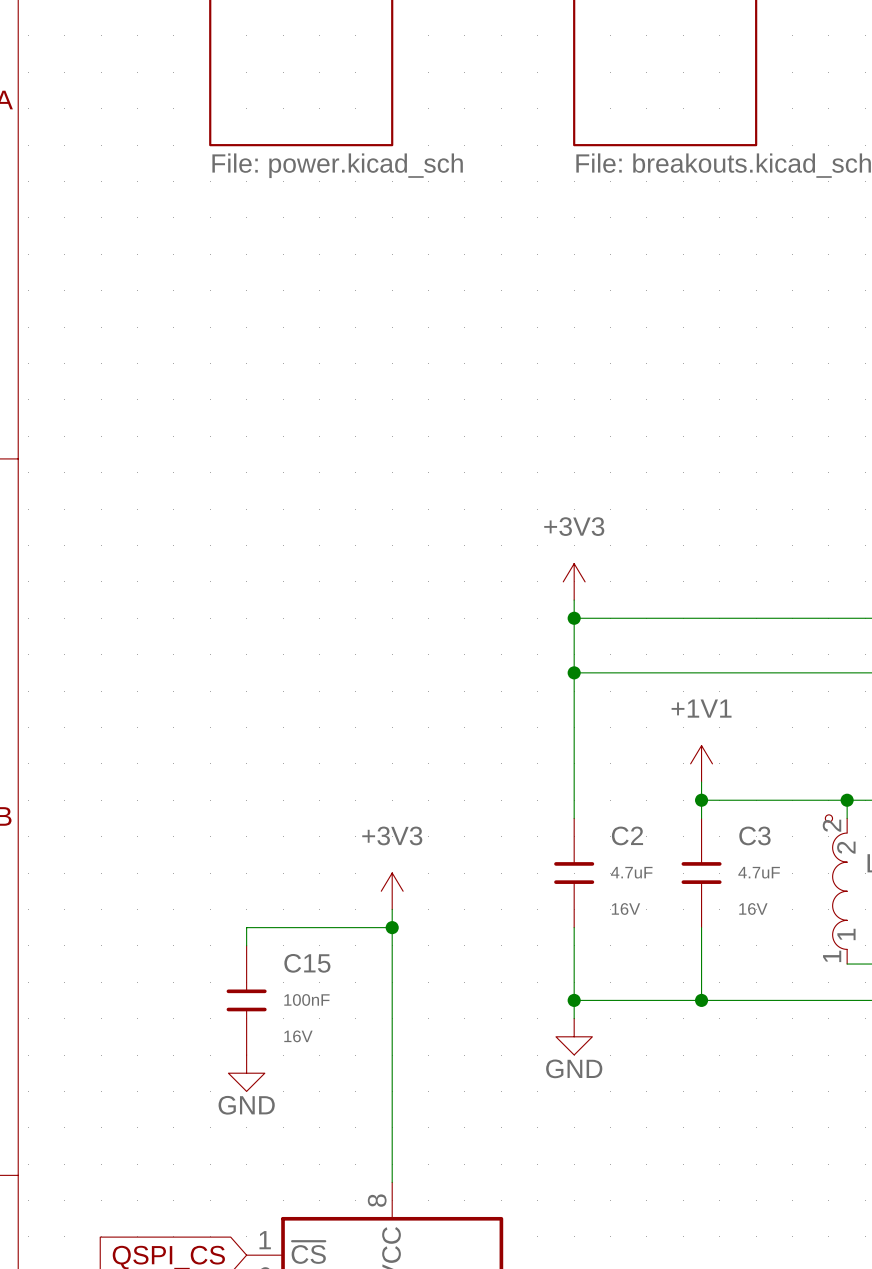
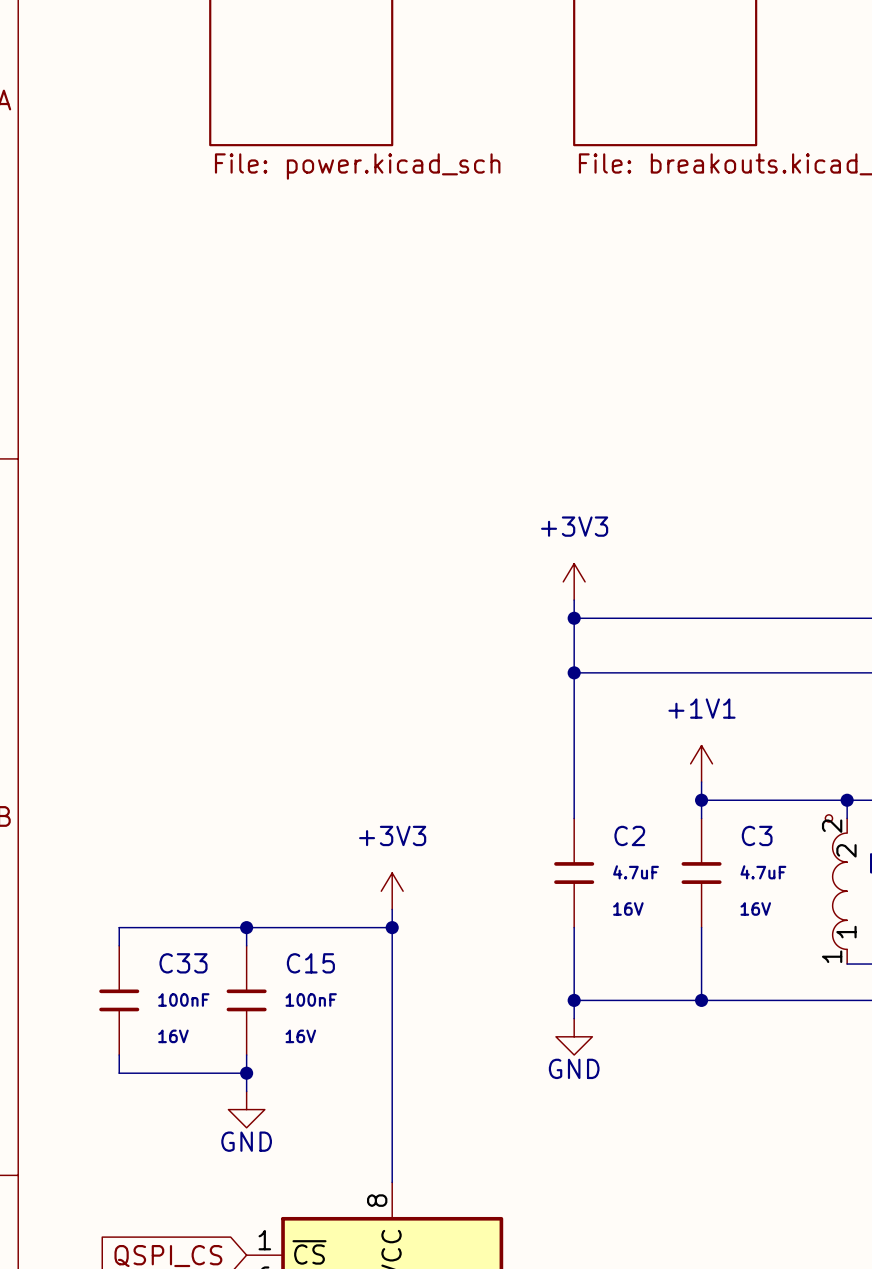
wire: none -> (246, 927) (119, 927) (119, 945)
junction: none -> (246, 927)
C33: none -> 100nF (119, 1000)
wire: none -> (119, 1055) (119, 1073) (246, 1073)
power symbol position: GND (246, 1073) -> GND (246, 1109)
junction: none -> (246, 1073)

